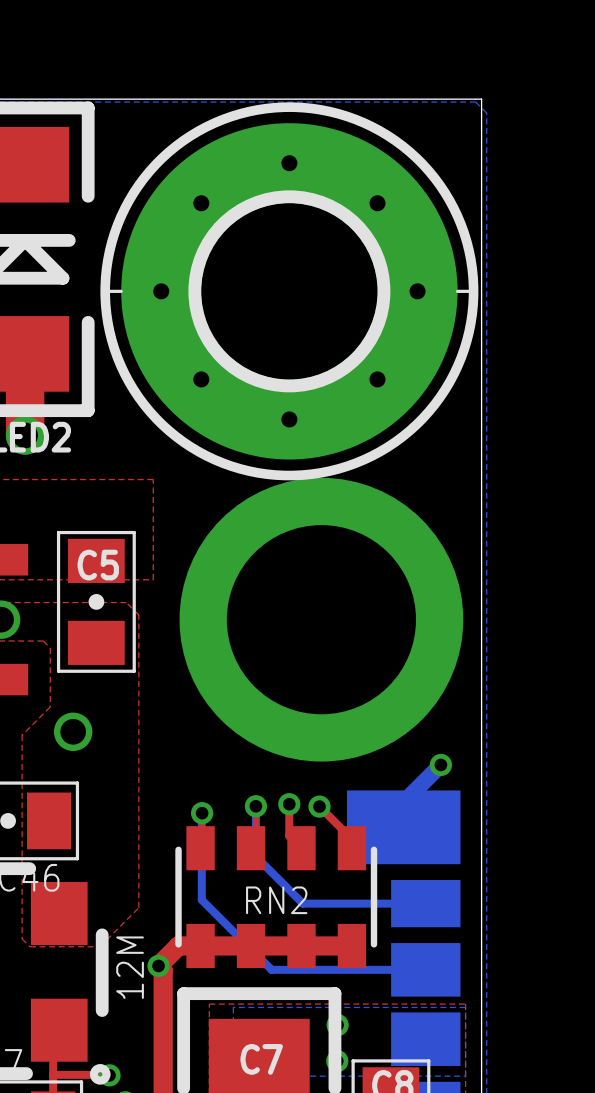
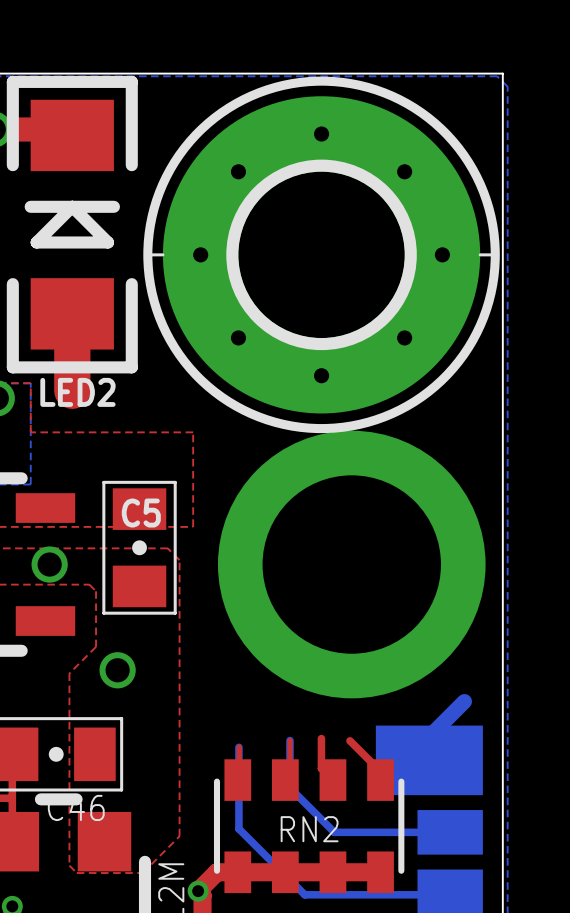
via: (25, 435) -> none
via: (440, 764) -> none
via: (289, 804) -> none
via: (255, 806) -> none
via: (319, 806) -> none
via: (202, 813) -> none

